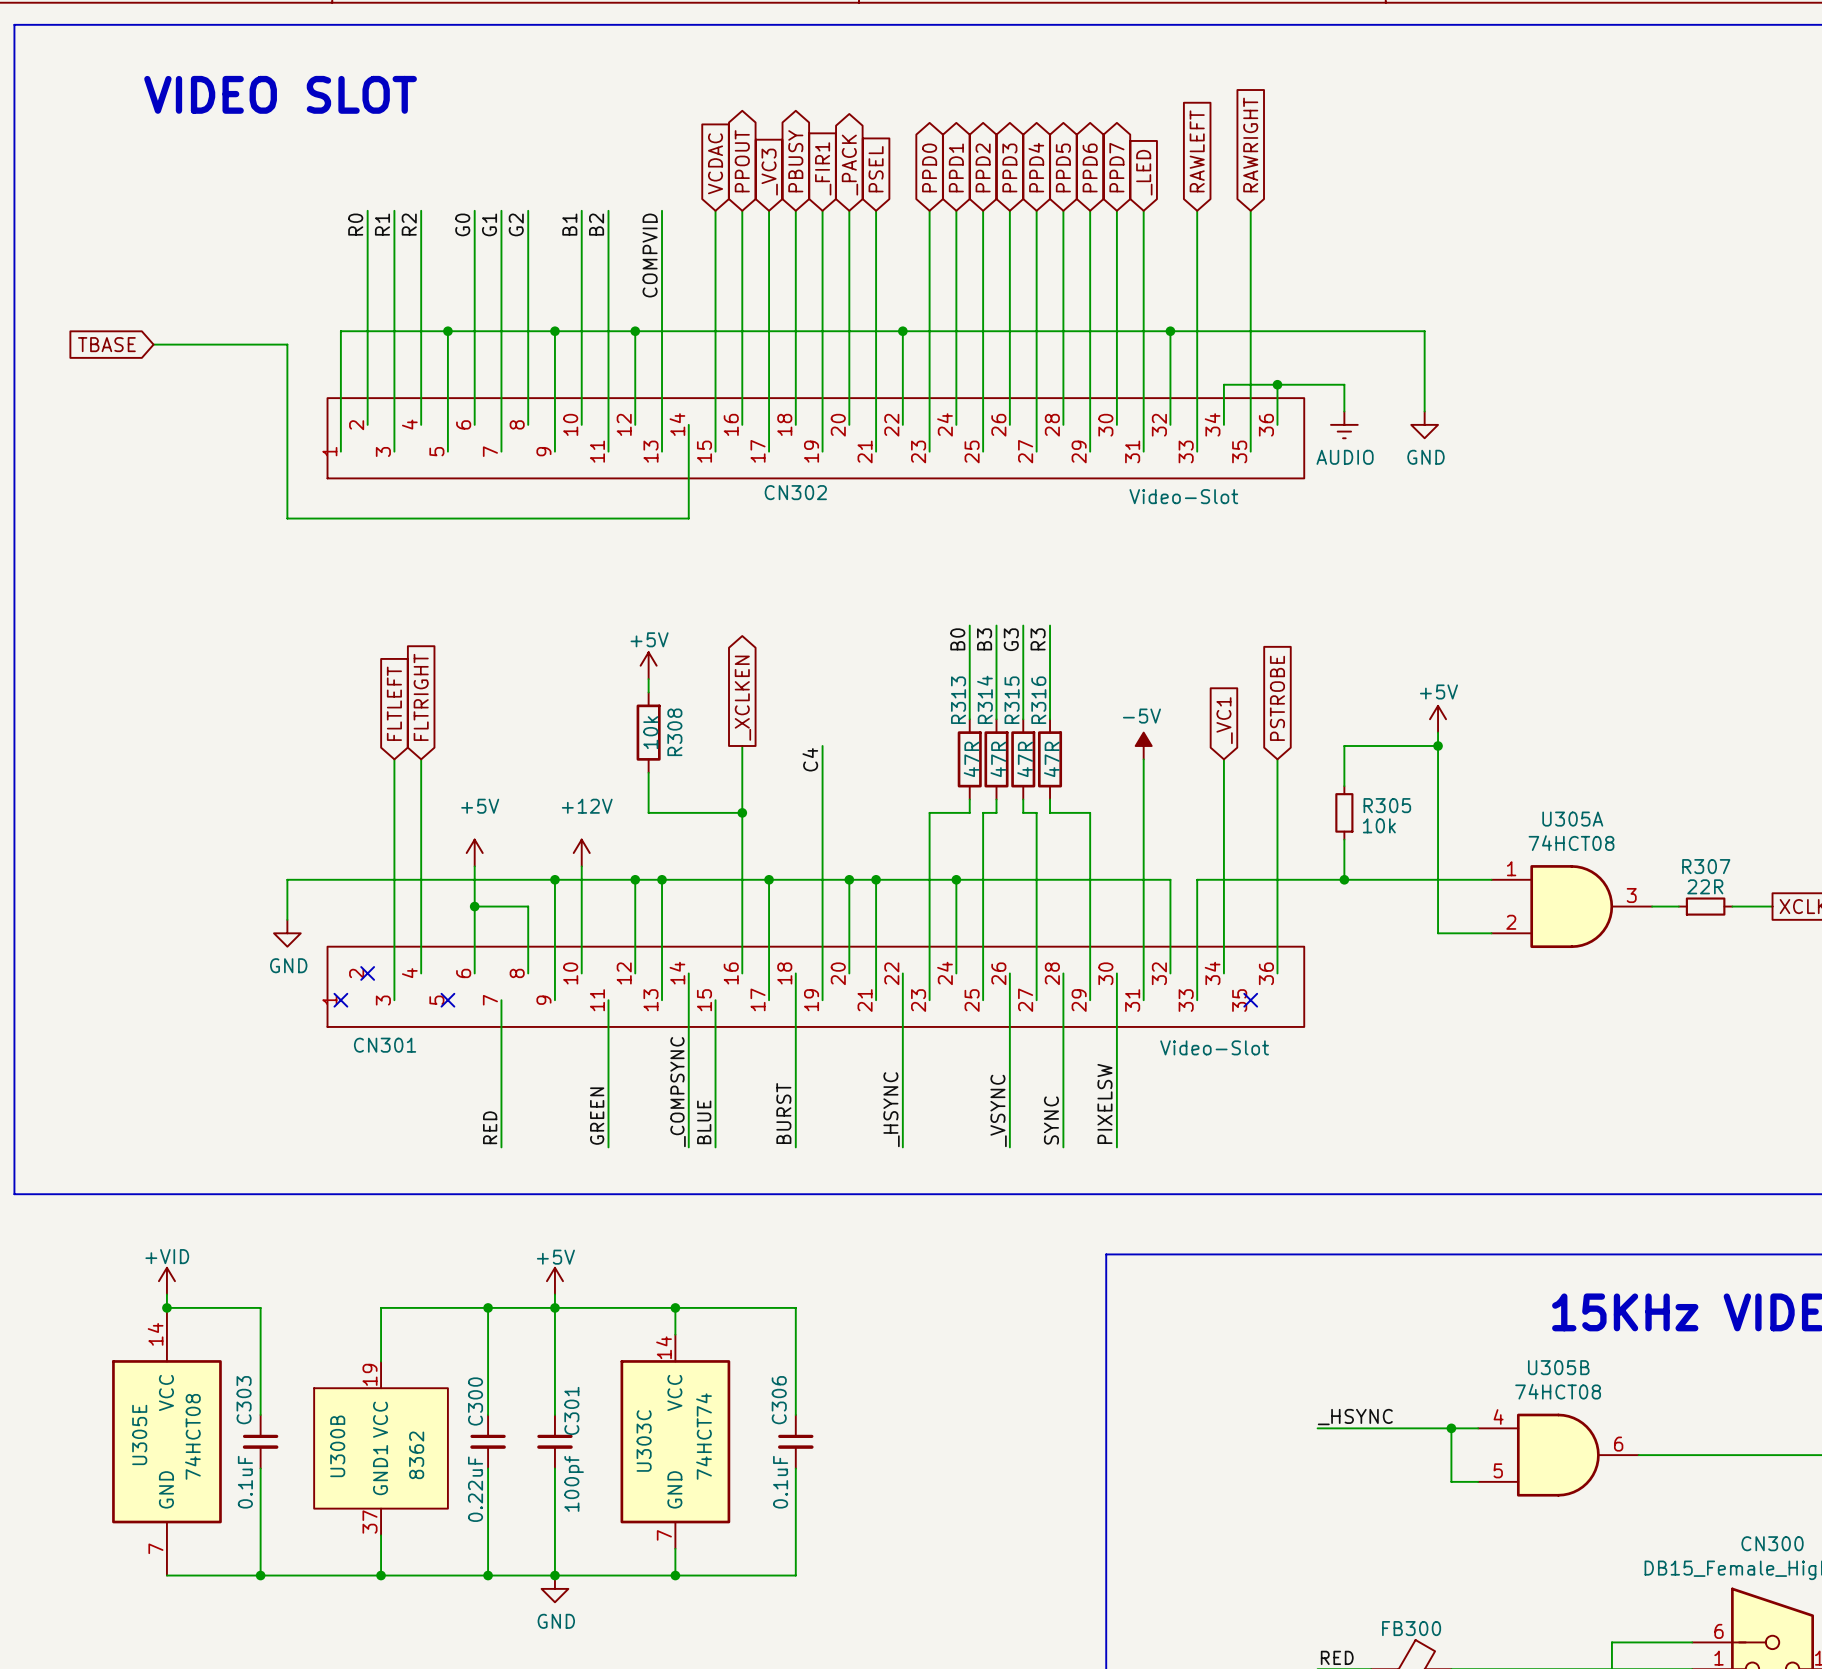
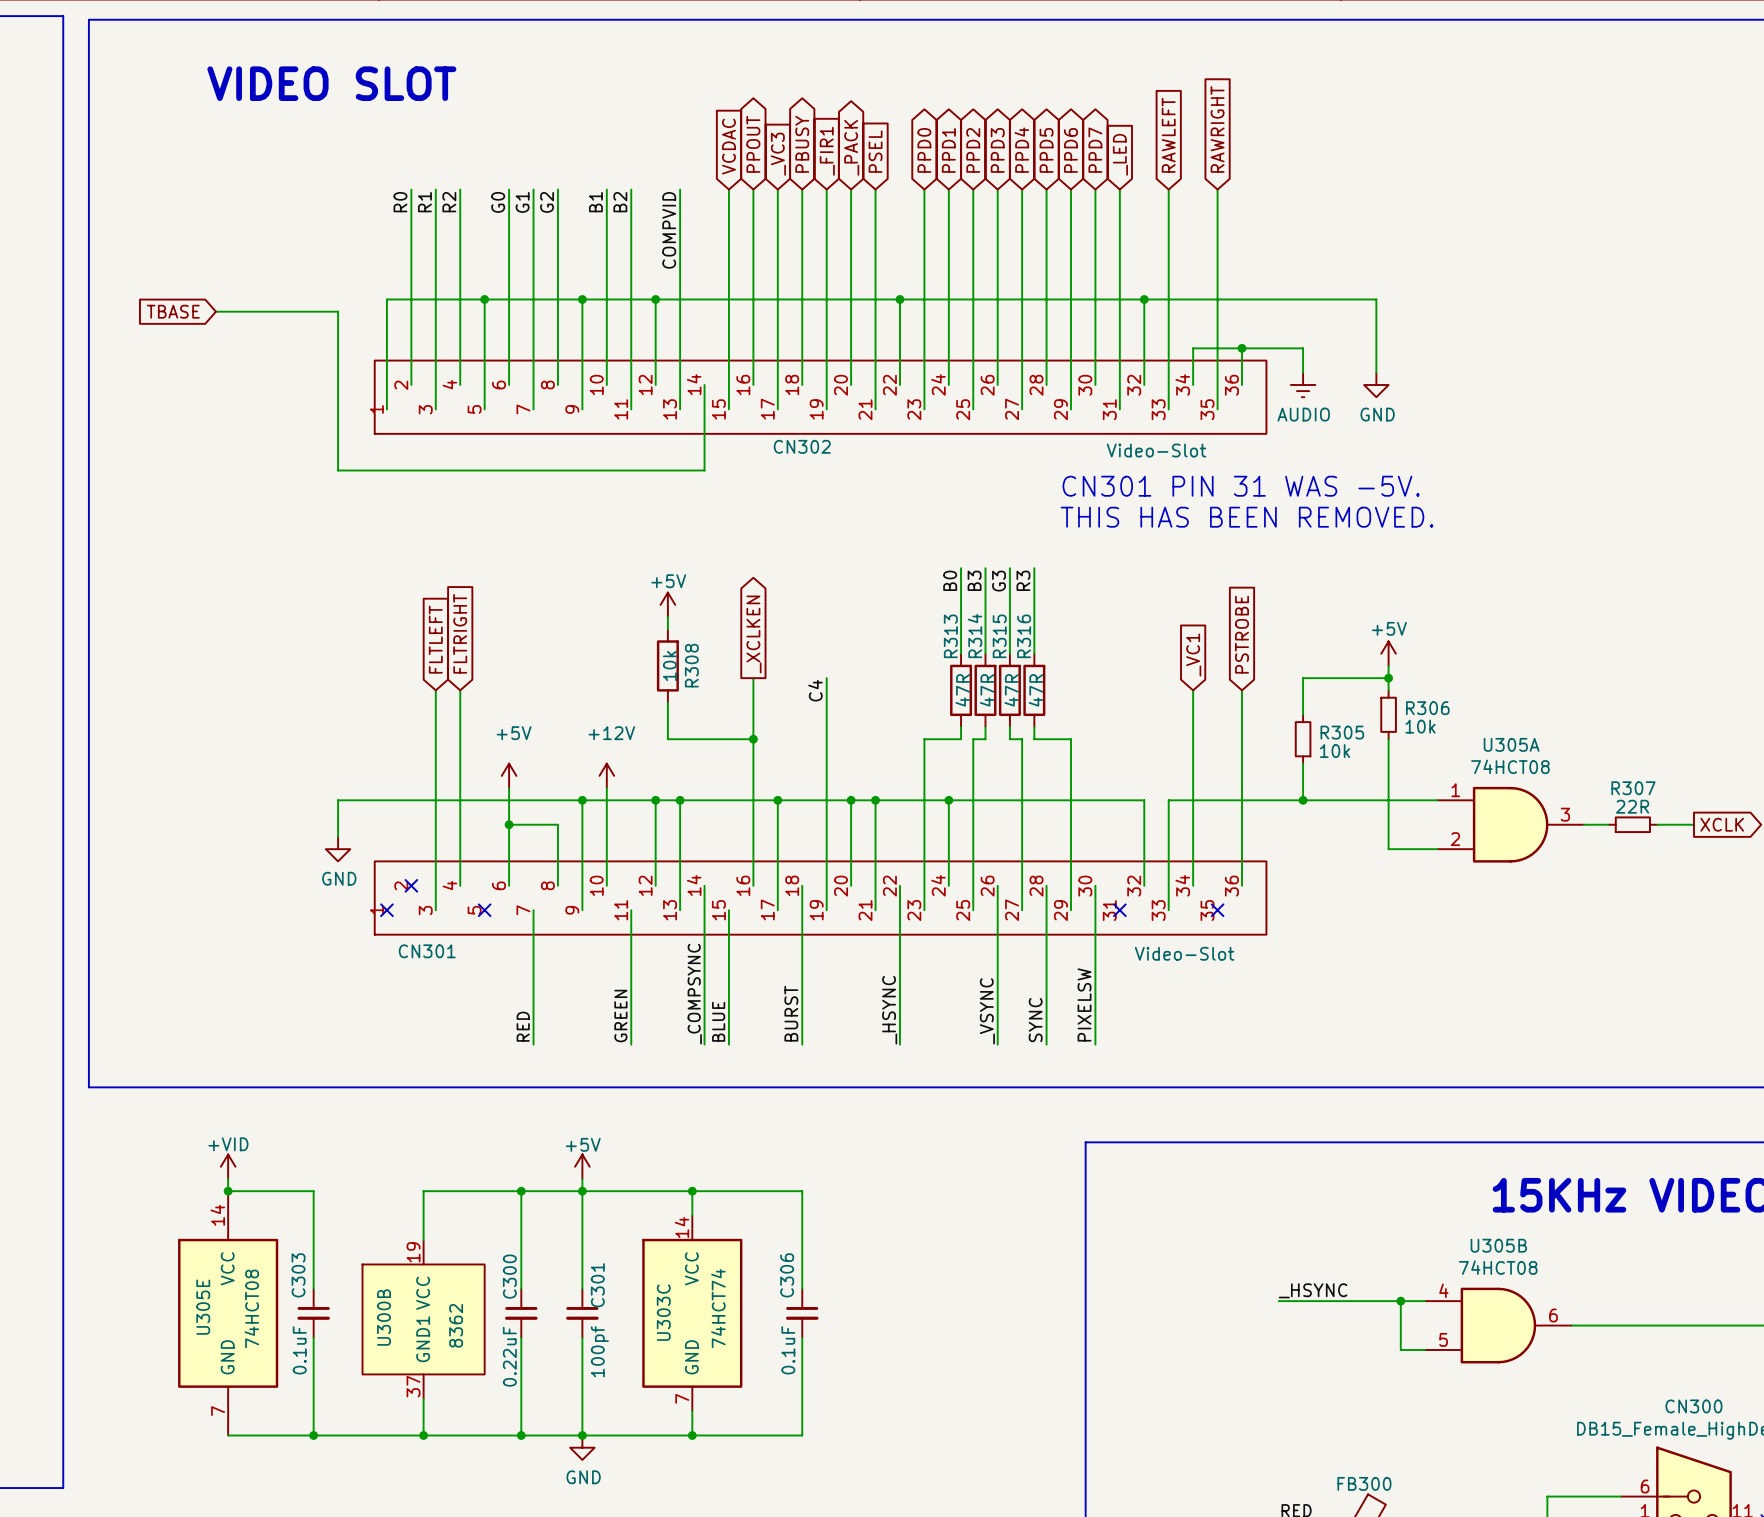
text: none -> CN301 PIN 31 WAS -5V. (1241, 486)
text: none -> THIS HAS BEEN REMOVED. (1247, 517)
power symbol: -5V (1143, 745) -> none
wire: (1143, 759) (1143, 1000) -> none
wire: (1438, 759) (1438, 812) -> none
R306: none -> 10k (1388, 714)
no-connect mark: none -> (1119, 910)

